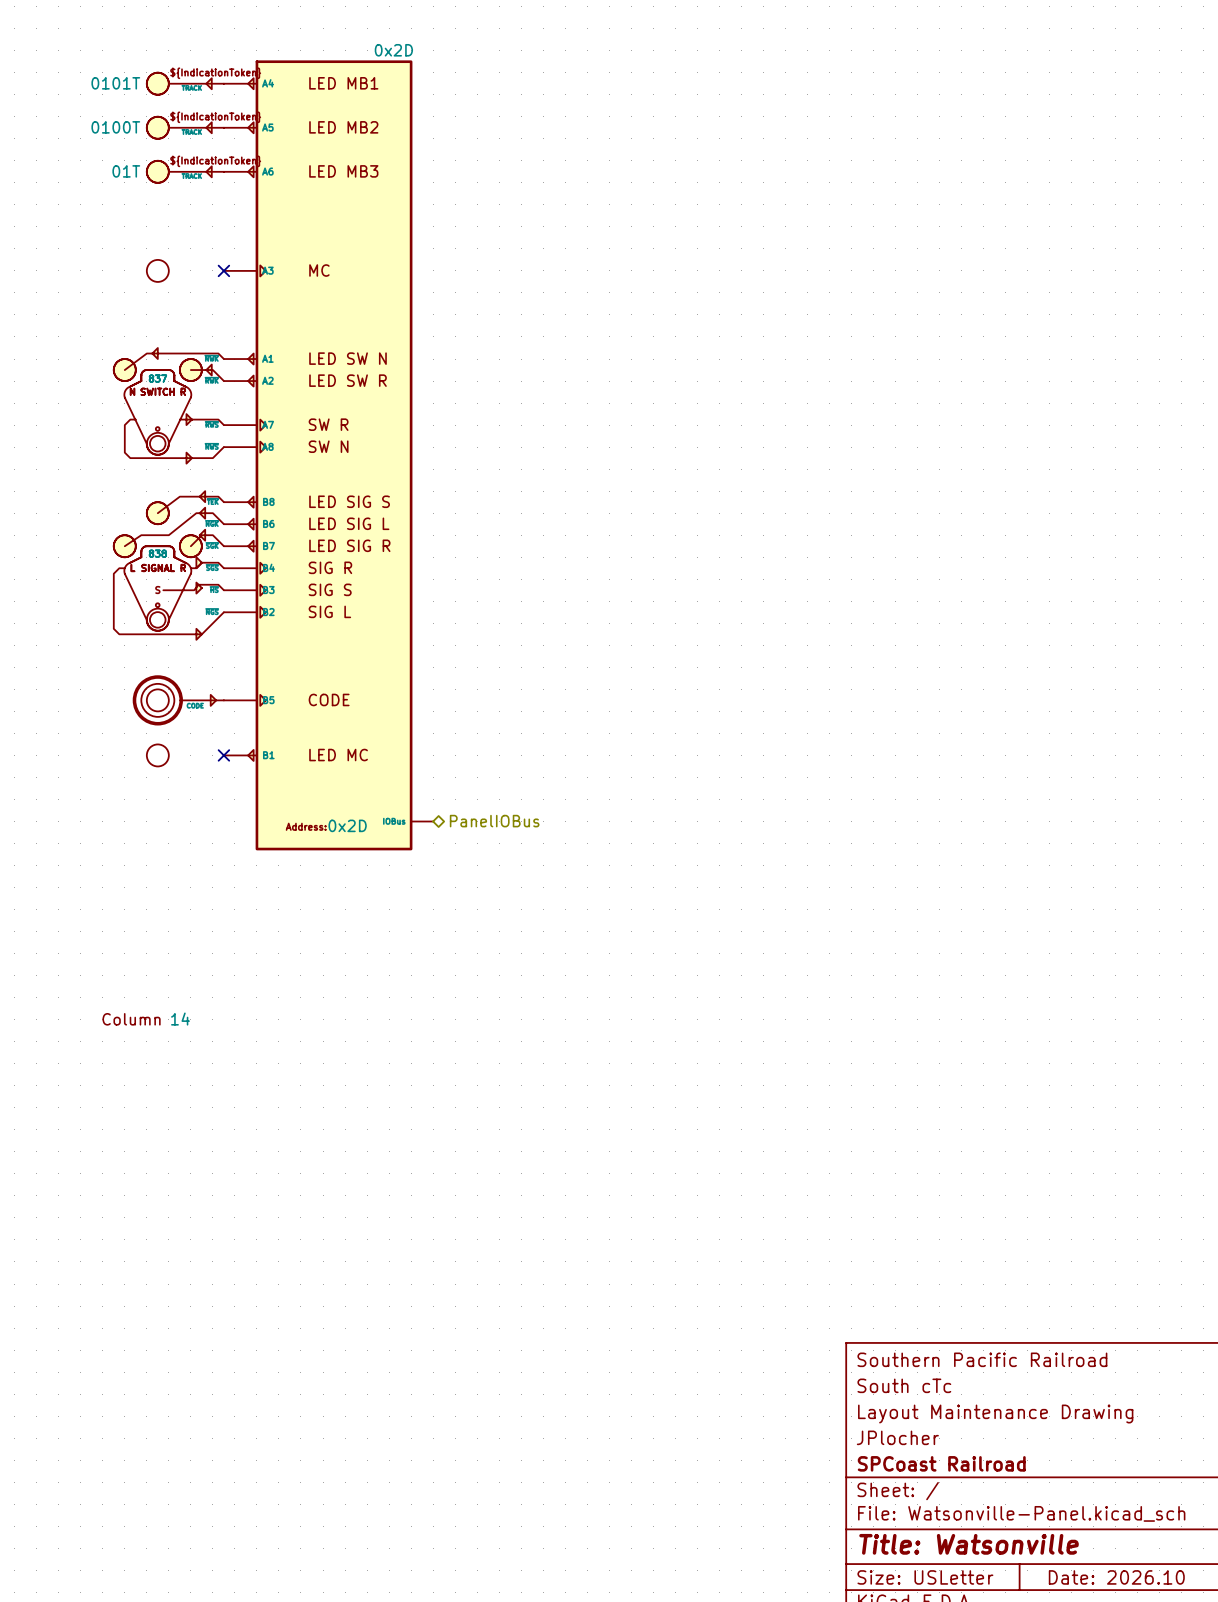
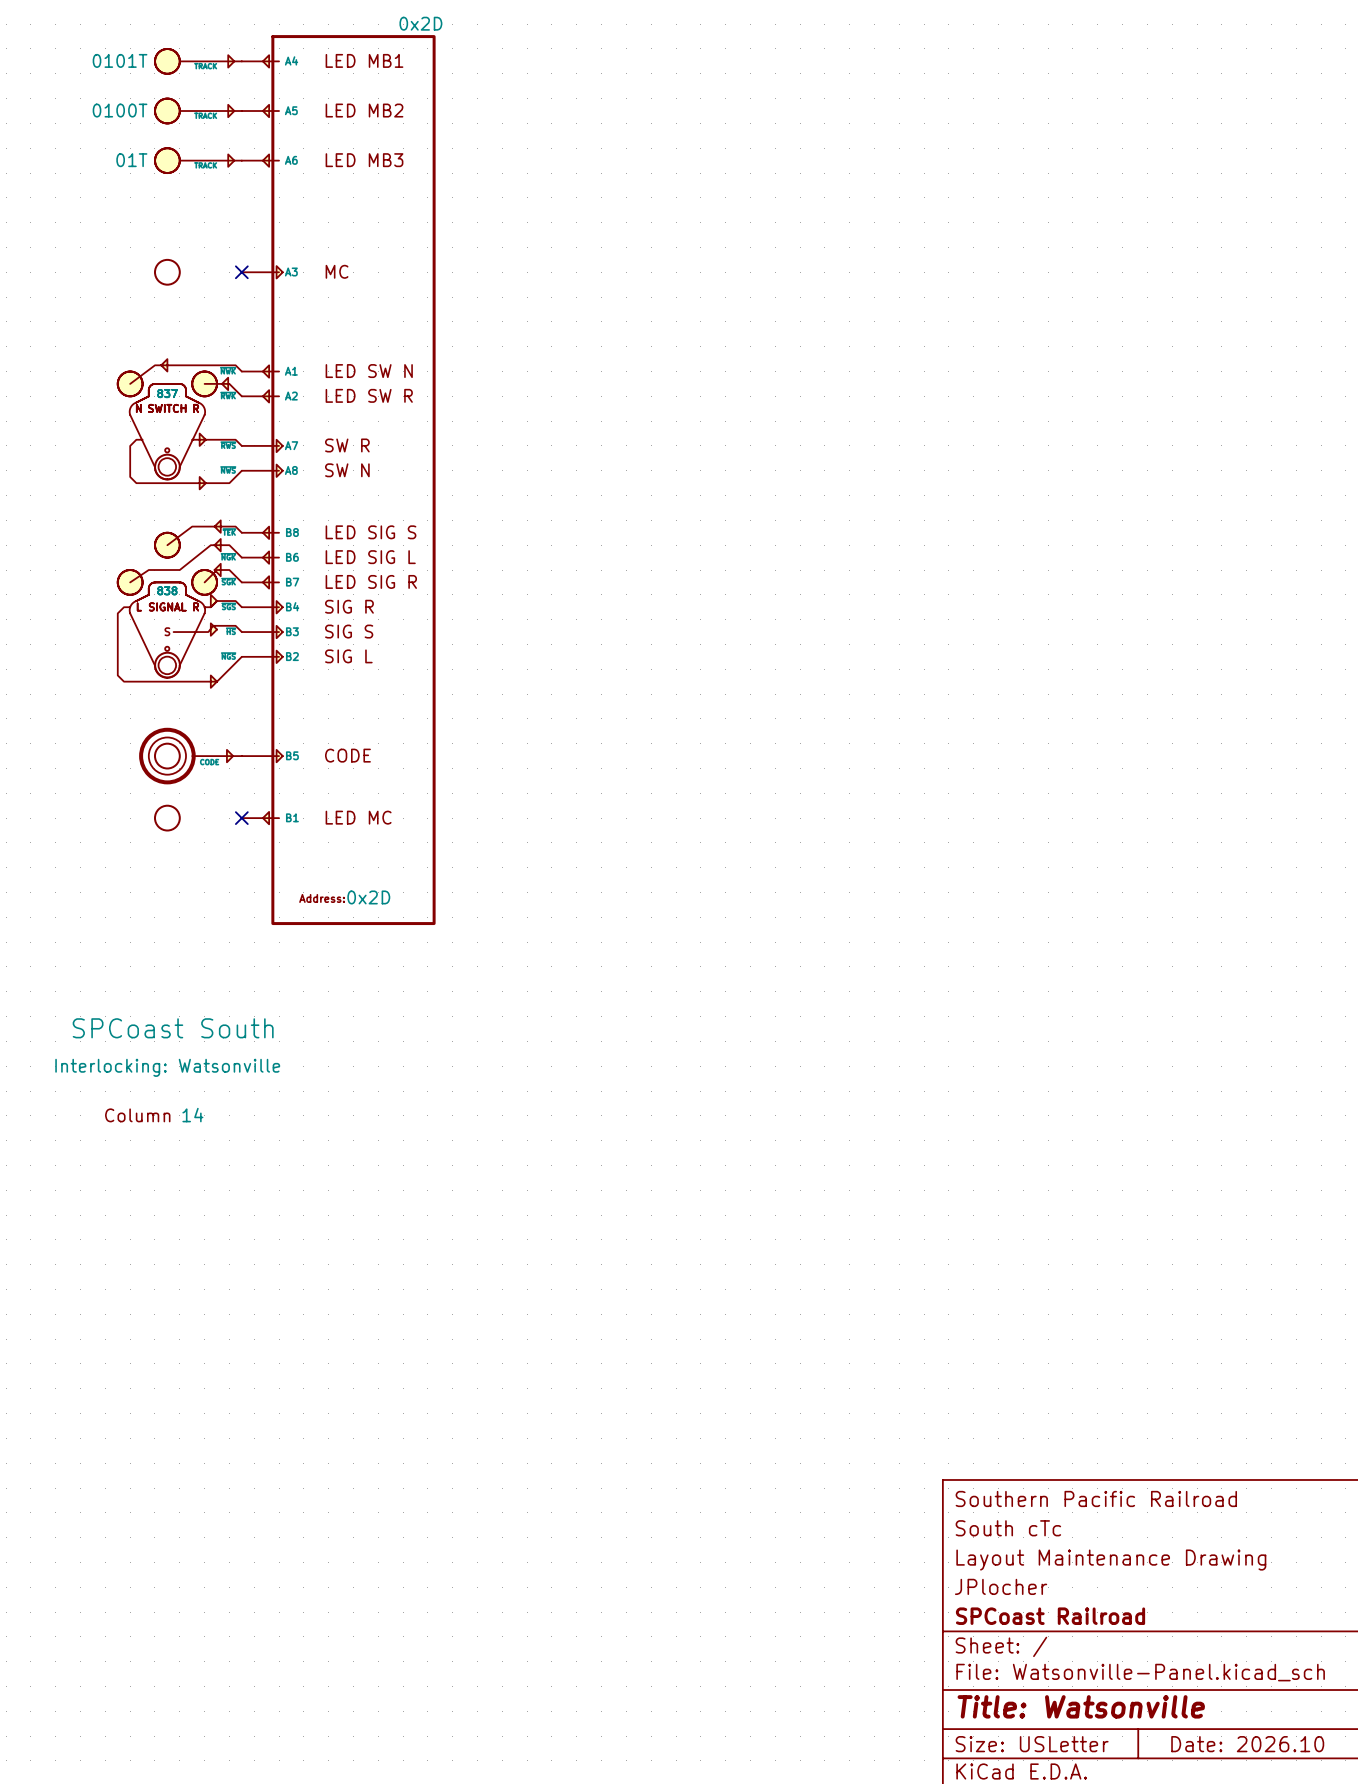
part symbol: [145, 71, 224, 96] -> [154, 47, 242, 75]
part symbol: [145, 115, 224, 140] -> [154, 97, 242, 125]
part symbol: [145, 159, 224, 184] -> [154, 147, 242, 175]
part: none -> 0x2D (338, 480)
part: 0x2D (328, 455) -> none
hierarchical label: PanelIOBus (494, 821) -> none
part text: none -> SPCoast South (173, 1028)
part text: none -> Interlocking: Watsonville (167, 1067)

